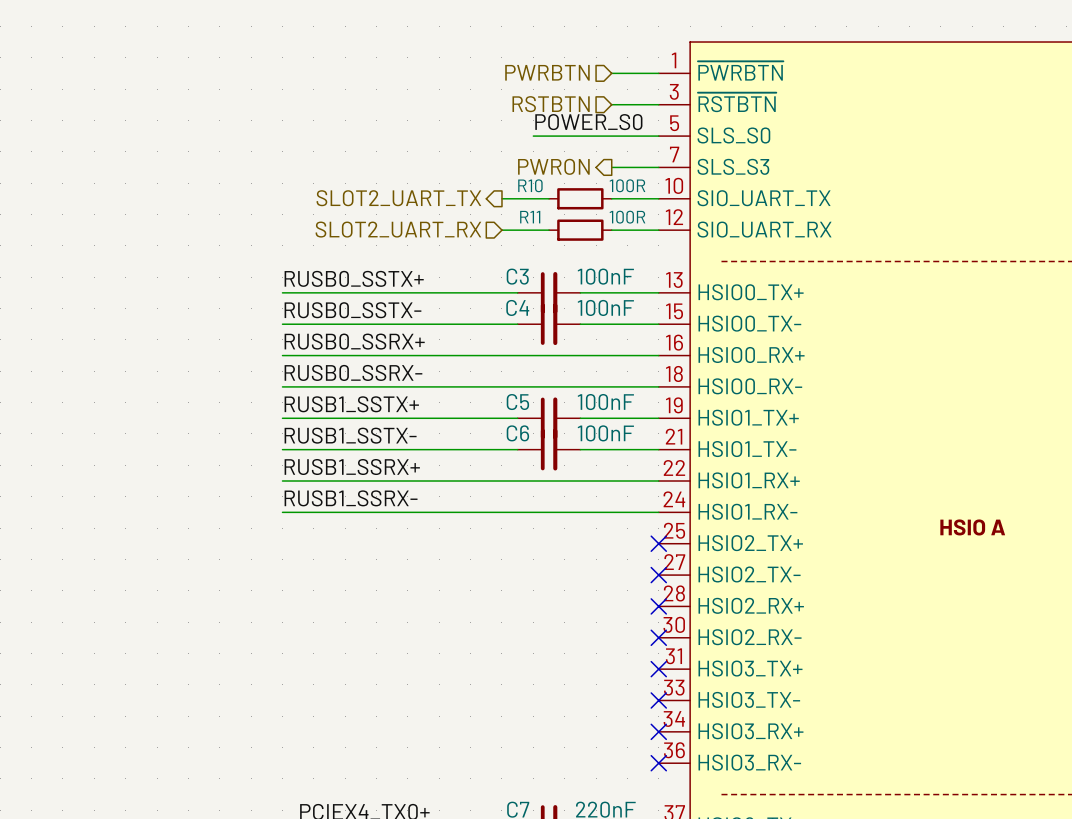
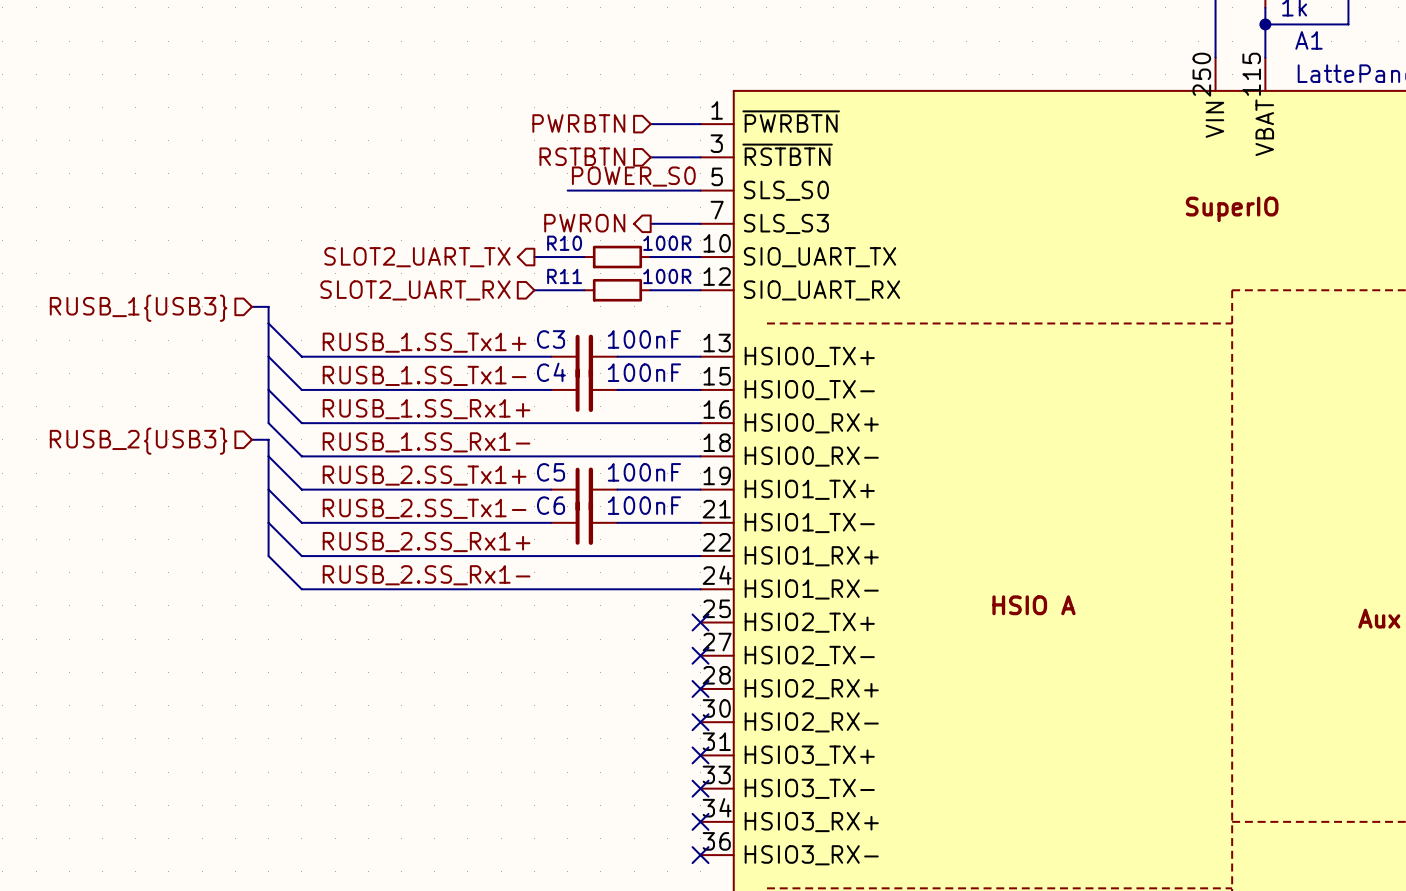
hierarchical label: none -> RUSB_1{USB3} (138, 308)
bus: none -> (251, 306) (268, 306) (268, 423)
wire: none -> (268, 323) (301, 356)
label: RUSB0_SSTX+ (354, 278) -> RUSB_1.SS_Tx1+ (424, 342)
wire: none -> (268, 356) (301, 389)
label: RUSB0_SSTX- (352, 310) -> RUSB_1.SS_Tx1- (424, 375)
wire: none -> (268, 389) (301, 423)
label: RUSB0_SSRX+ (354, 341) -> RUSB_1.SS_Rx1+ (426, 409)
wire: none -> (268, 423) (301, 456)
hierarchical label: none -> RUSB_2{USB3} (138, 441)
bus: none -> (251, 439) (268, 439) (268, 556)
label: RUSB0_SSRX- (353, 372) -> RUSB_1.SS_Rx1- (426, 442)
wire: none -> (268, 456) (301, 489)
label: RUSB1_SSTX+ (351, 404) -> RUSB_2.SS_Tx1+ (424, 475)
wire: none -> (268, 489) (301, 522)
label: RUSB1_SSTX- (350, 435) -> RUSB_2.SS_Tx1- (424, 508)
wire: none -> (268, 522) (301, 556)
label: RUSB1_SSRX+ (352, 467) -> RUSB_2.SS_Rx1+ (426, 542)
wire: none -> (268, 556) (301, 589)
label: RUSB1_SSRX- (351, 498) -> RUSB_2.SS_Rx1- (426, 575)

